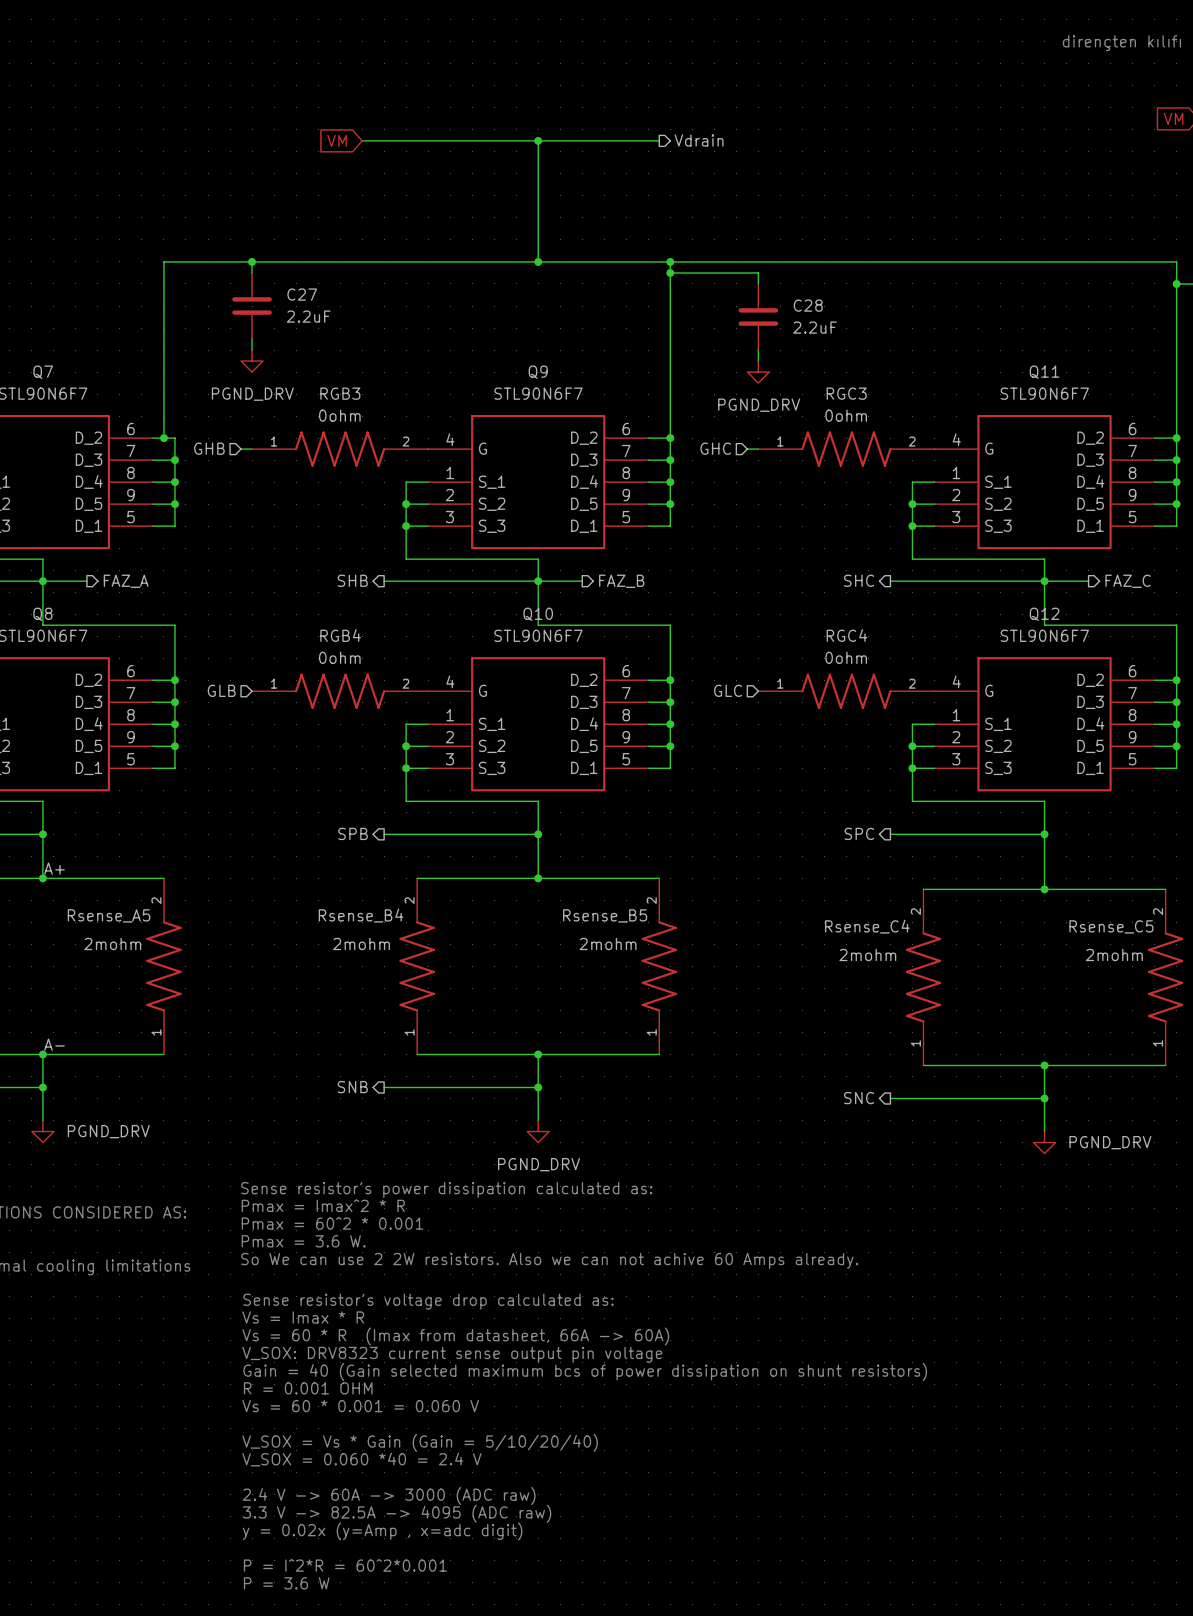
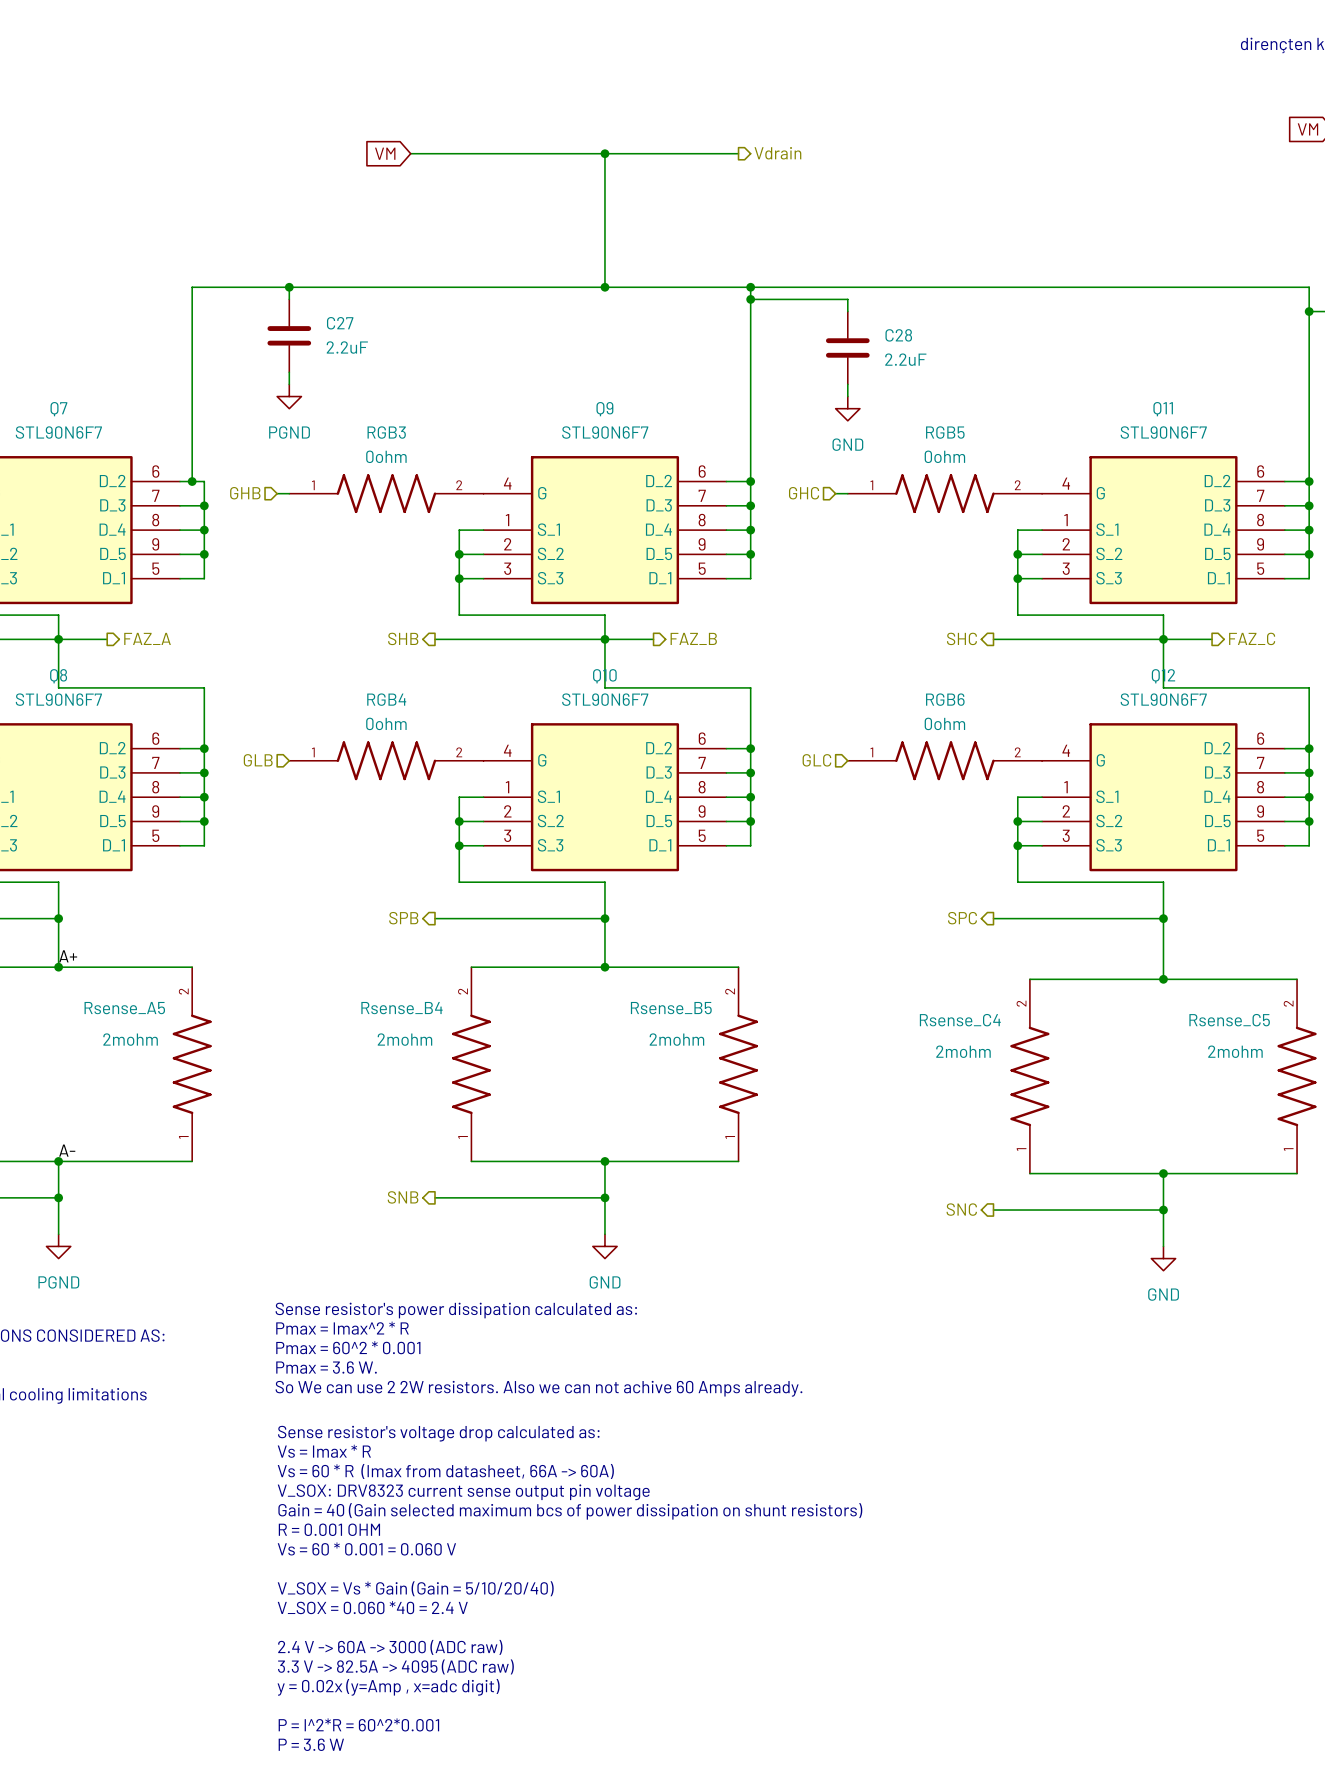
power symbol: PGND_DRV (252, 361) -> PGND (289, 396)
power symbol: PGND_DRV (758, 372) -> GND (847, 408)
RGC3 name: RGC3 (846, 393) -> RGB5 (945, 432)
RGC4 name: RGC4 (846, 635) -> RGB6 (945, 699)
power symbol: PGND_DRV (42, 1131) -> PGND (58, 1246)
power symbol: PGND_DRV (538, 1131) -> GND (604, 1246)
power symbol: PGND_DRV (1044, 1142) -> GND (1163, 1258)

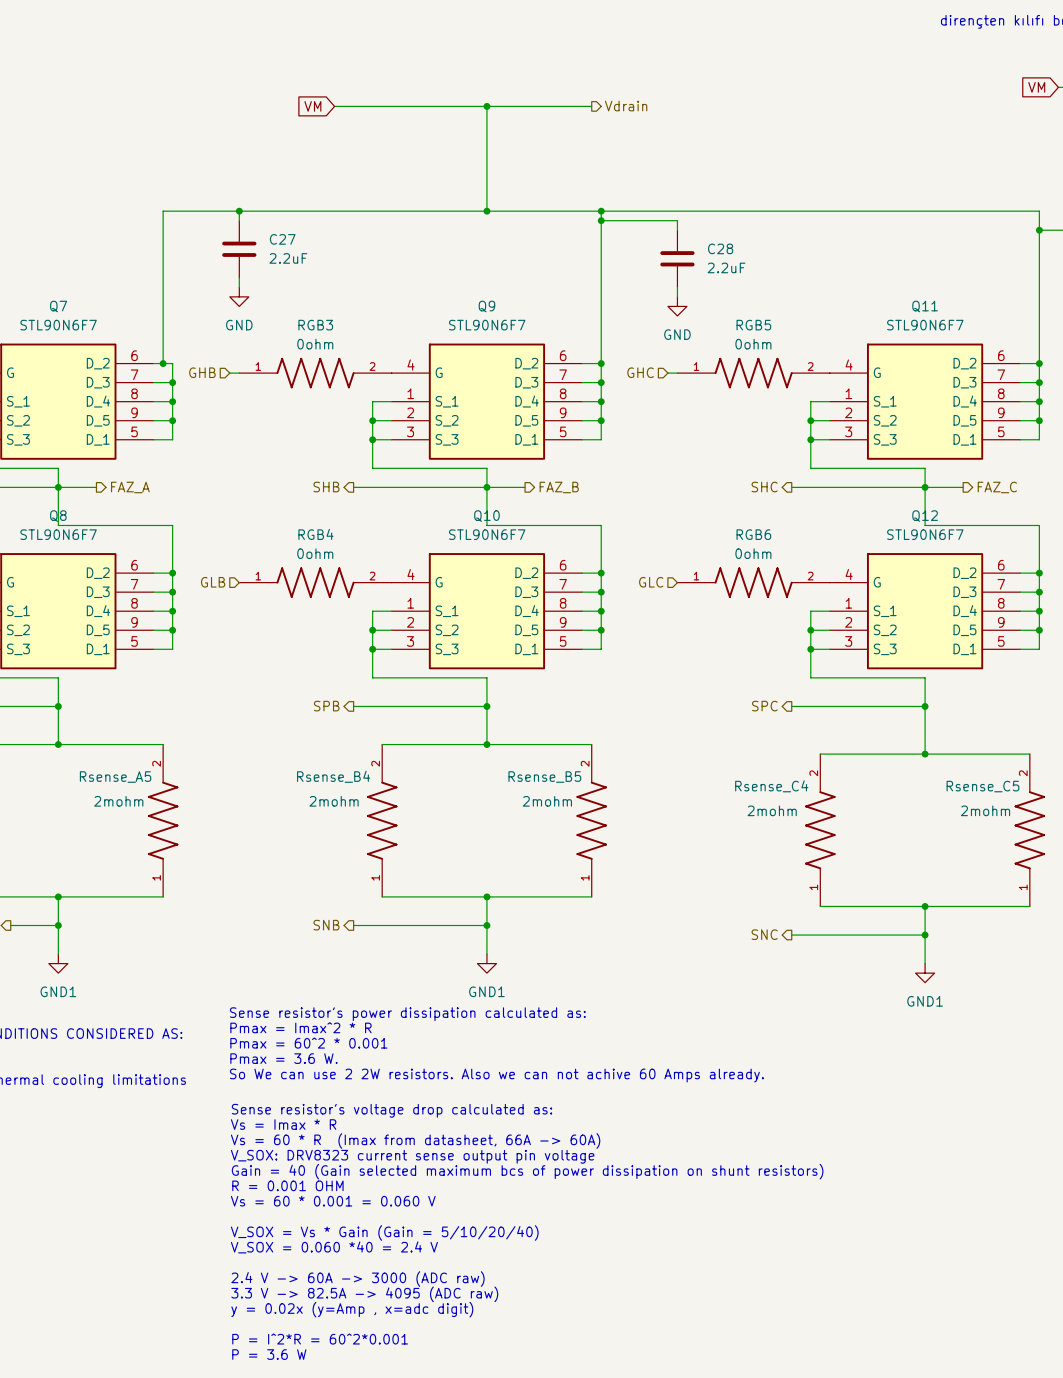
power symbol: PGND (289, 396) -> GND (239, 296)
label: A+ (68, 956) -> none
label: A- (67, 1150) -> none
power symbol: PGND (58, 1246) -> GND1 (58, 963)
power symbol: GND (604, 1246) -> GND1 (486, 963)
power symbol: GND (1163, 1258) -> GND1 (925, 973)

